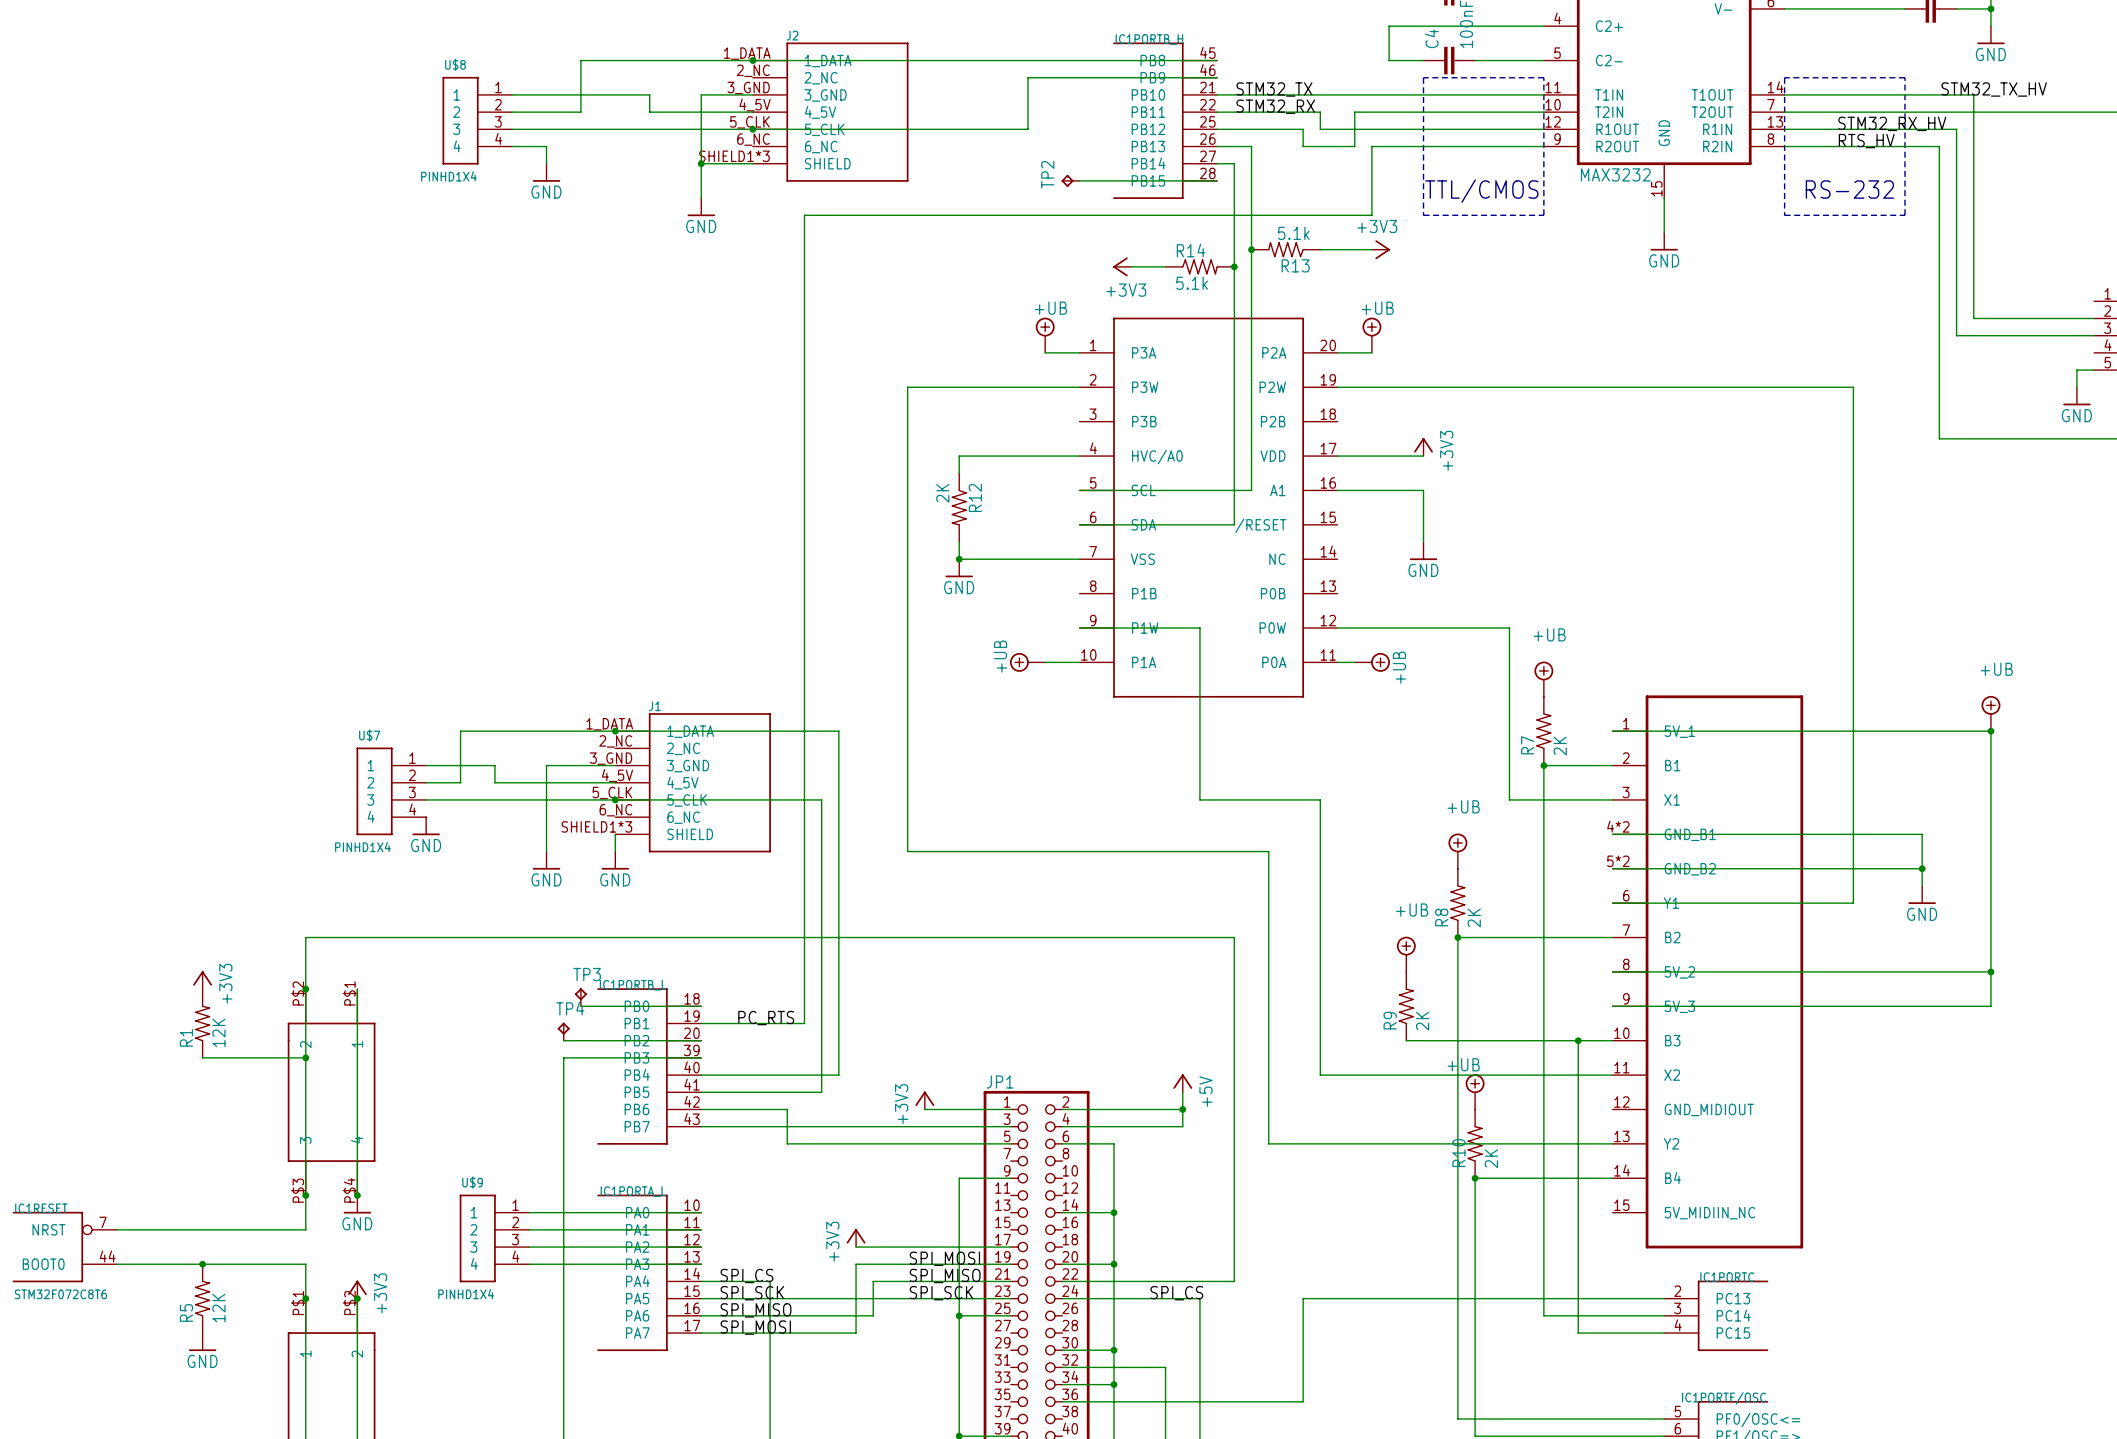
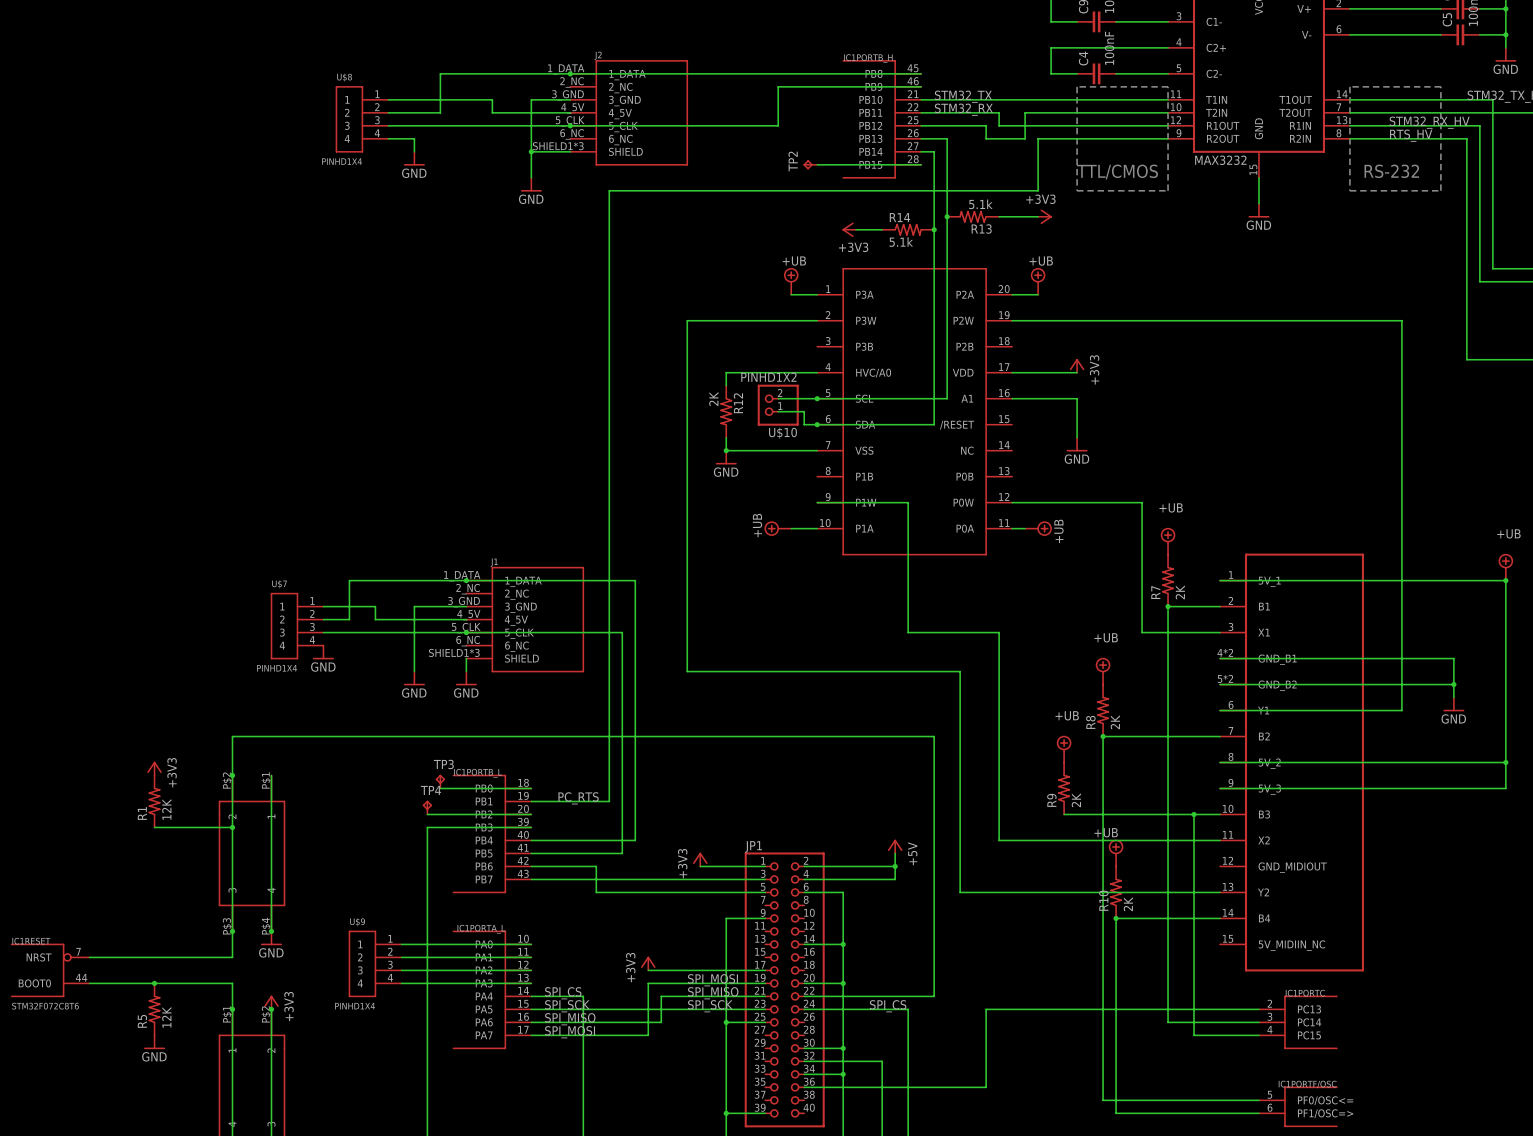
wire: none -> (778, 398) (817, 398)
junction: none -> (817, 398)
U$10: none -> PINHD1X2 (778, 405)
wire: none -> (778, 411) (804, 411) (804, 424) (817, 424)
junction: none -> (817, 424)

